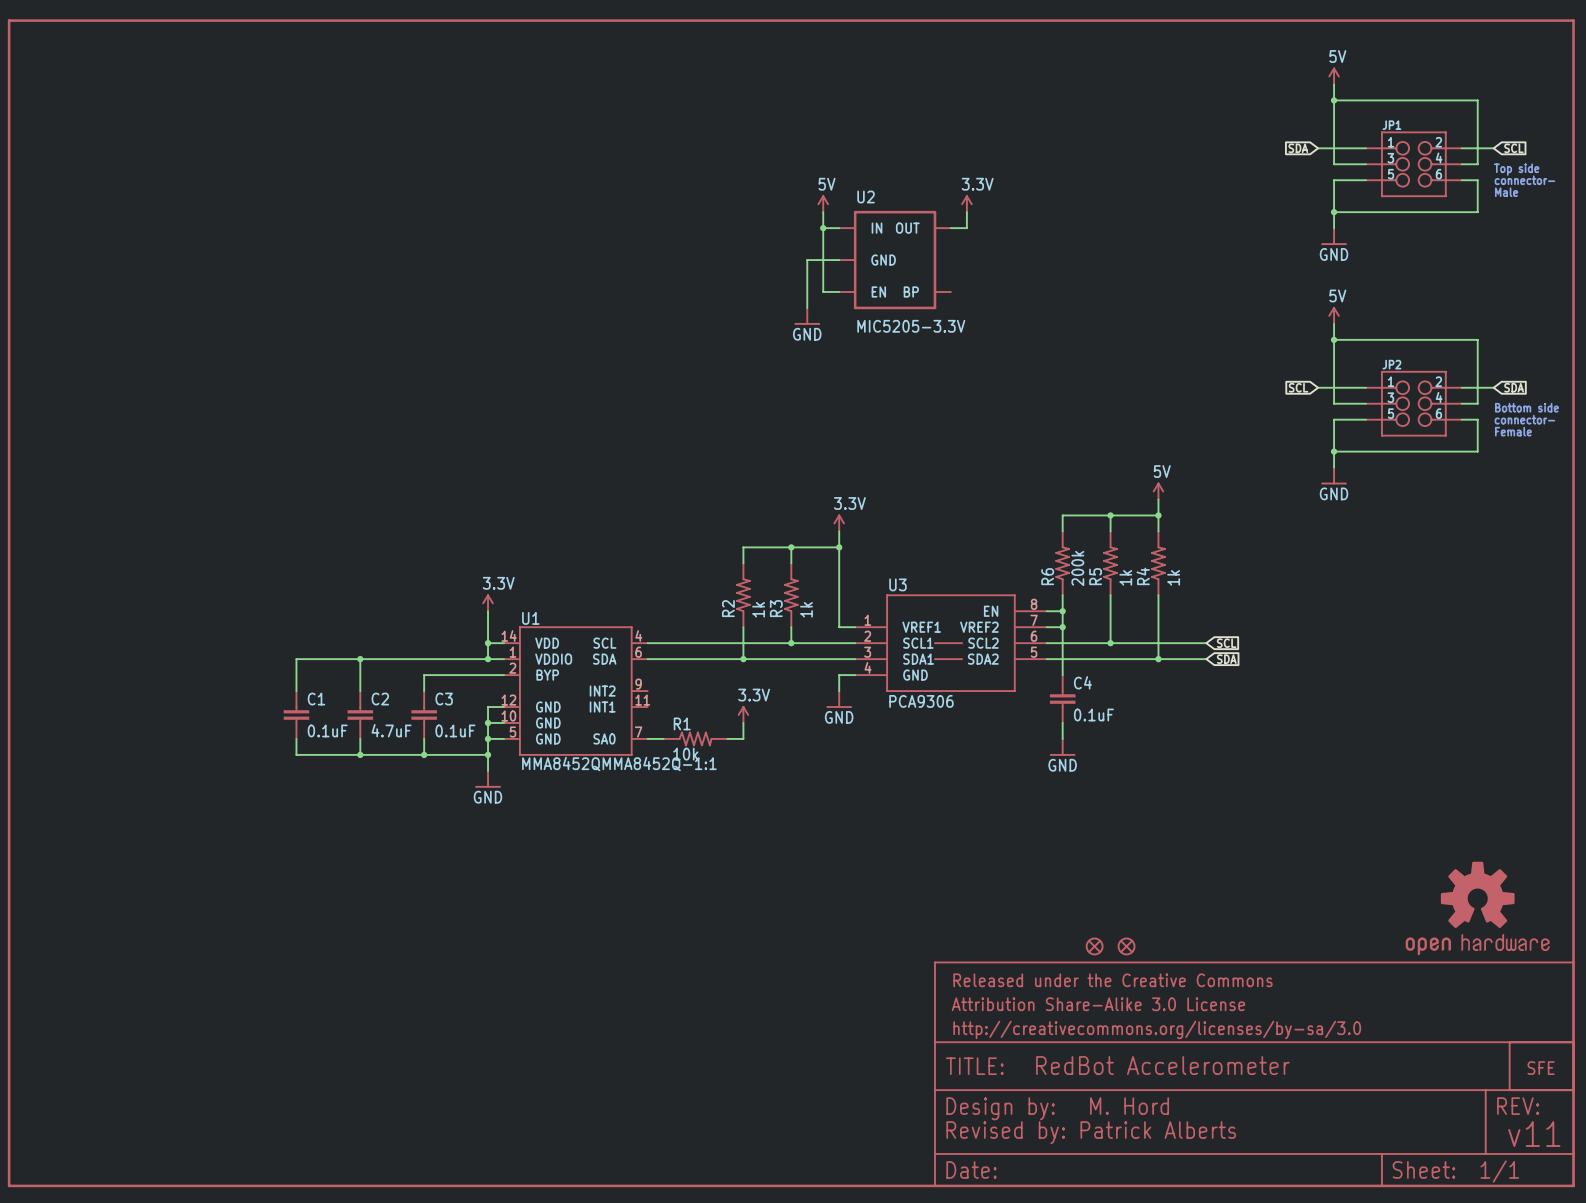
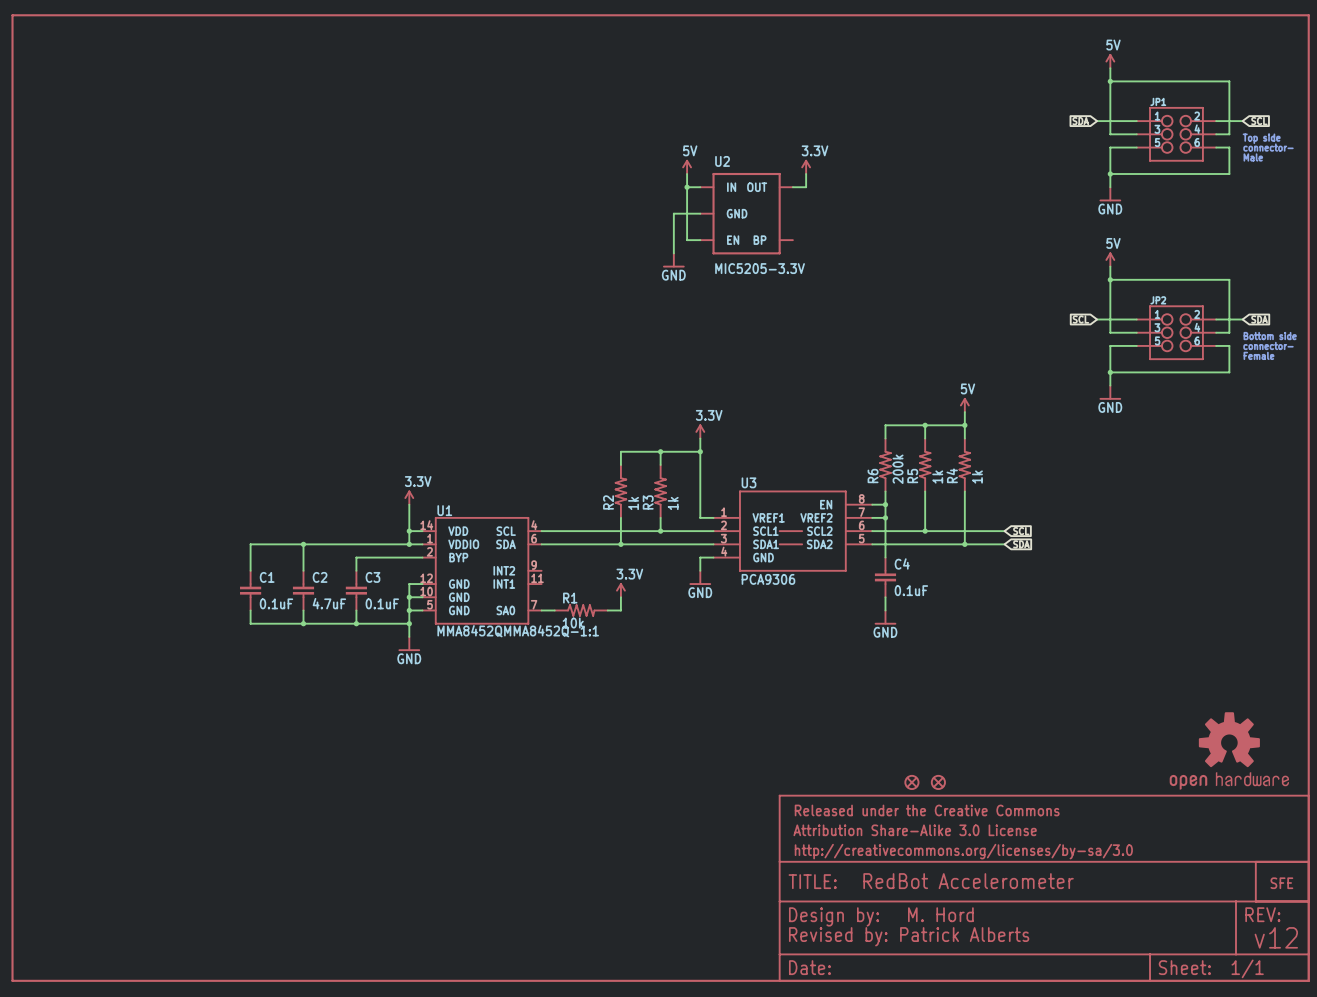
text: v11 (1534, 1134) -> v12 (1276, 937)

